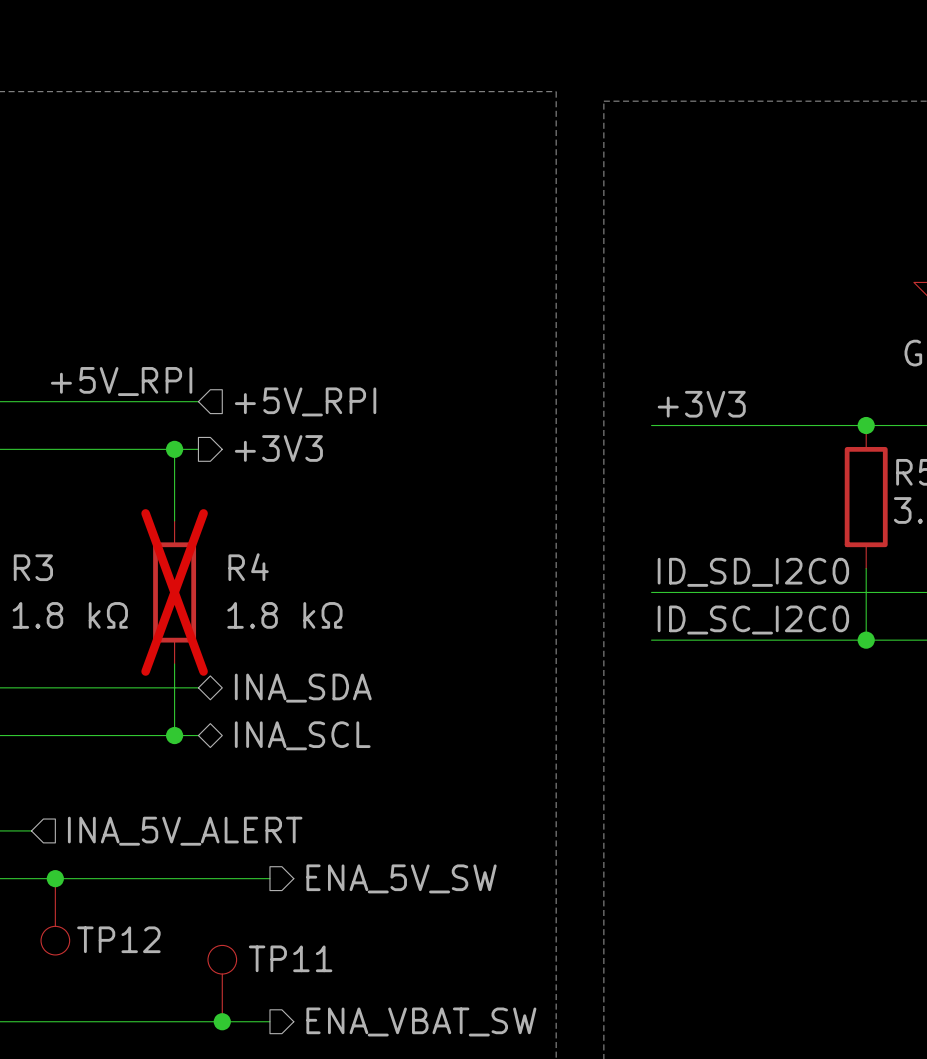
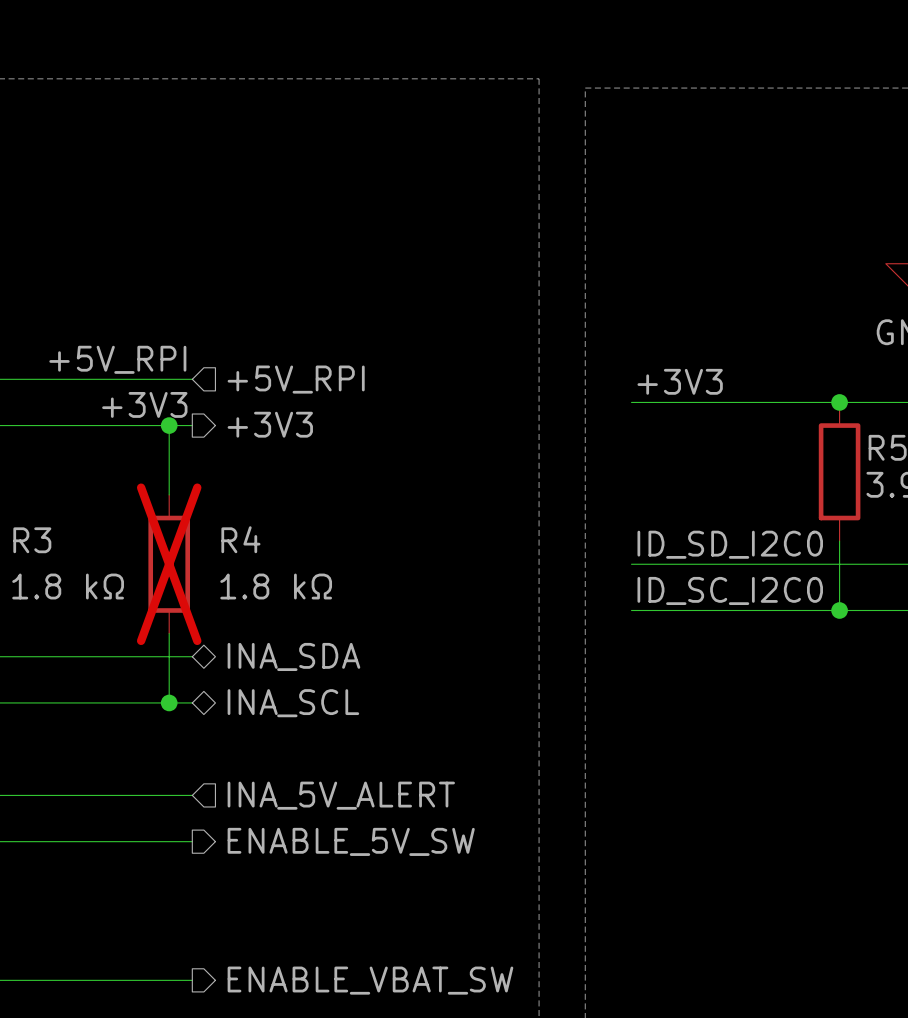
label: none -> +3V3 (144, 404)
wire: none -> (30, 795) (192, 795)
hierarchical label position: INA_5V_ALERT (185, 831) -> INA_5V_ALERT (341, 795)
junction: (55, 878) -> none
wire: (198, 878) (269, 878) -> none
hierarchical label: ENA_5V_SW (401, 878) -> ENABLE_5V_SW (351, 841)
TP12: (55, 916) -> none
TP11: (222, 983) -> none
wire: (198, 1021) (269, 1021) -> none
junction: (222, 1021) -> none
hierarchical label: ENA_VBAT_SW (421, 1021) -> ENABLE_VBAT_SW (370, 980)

